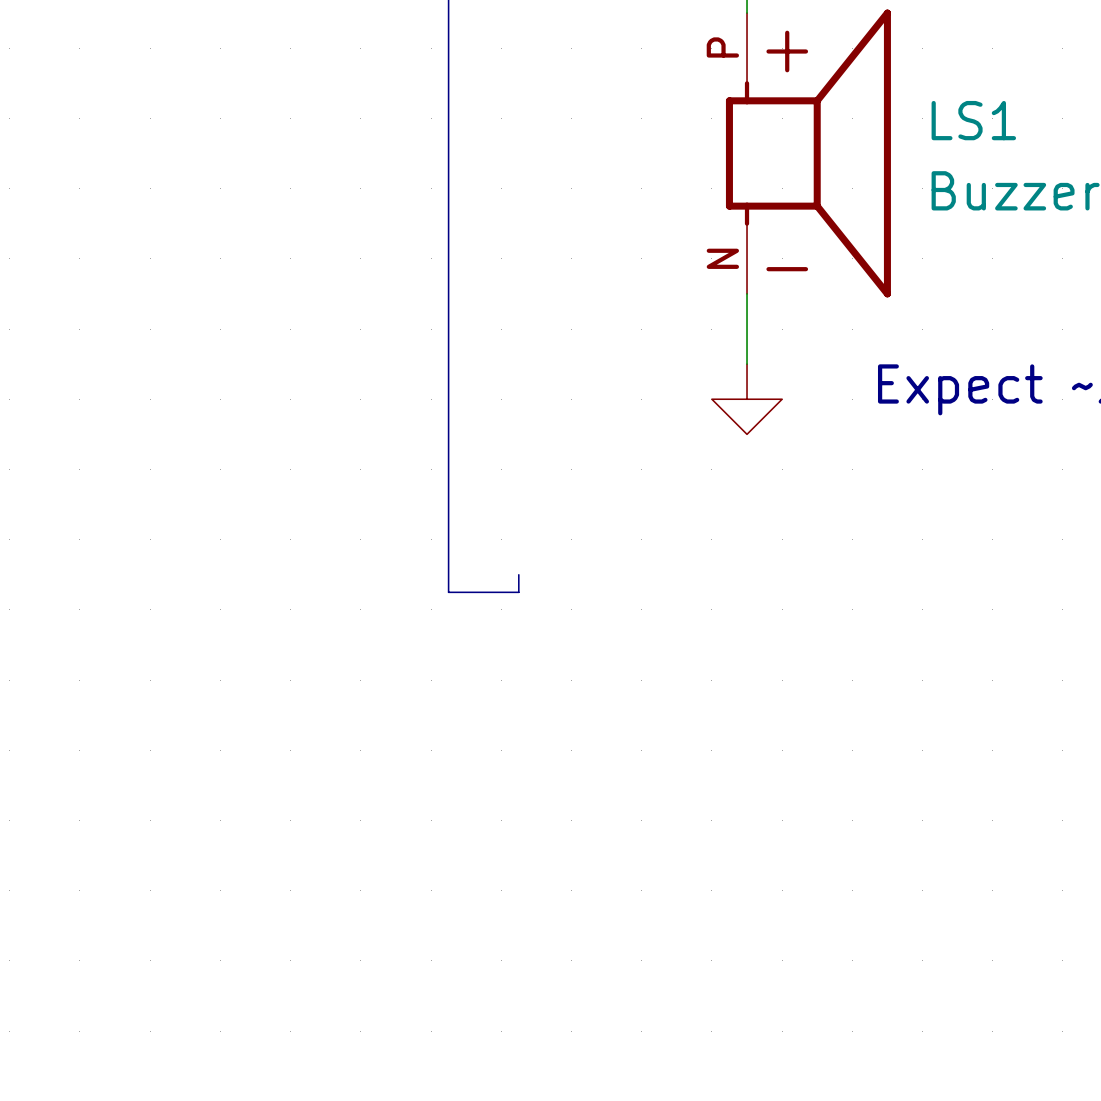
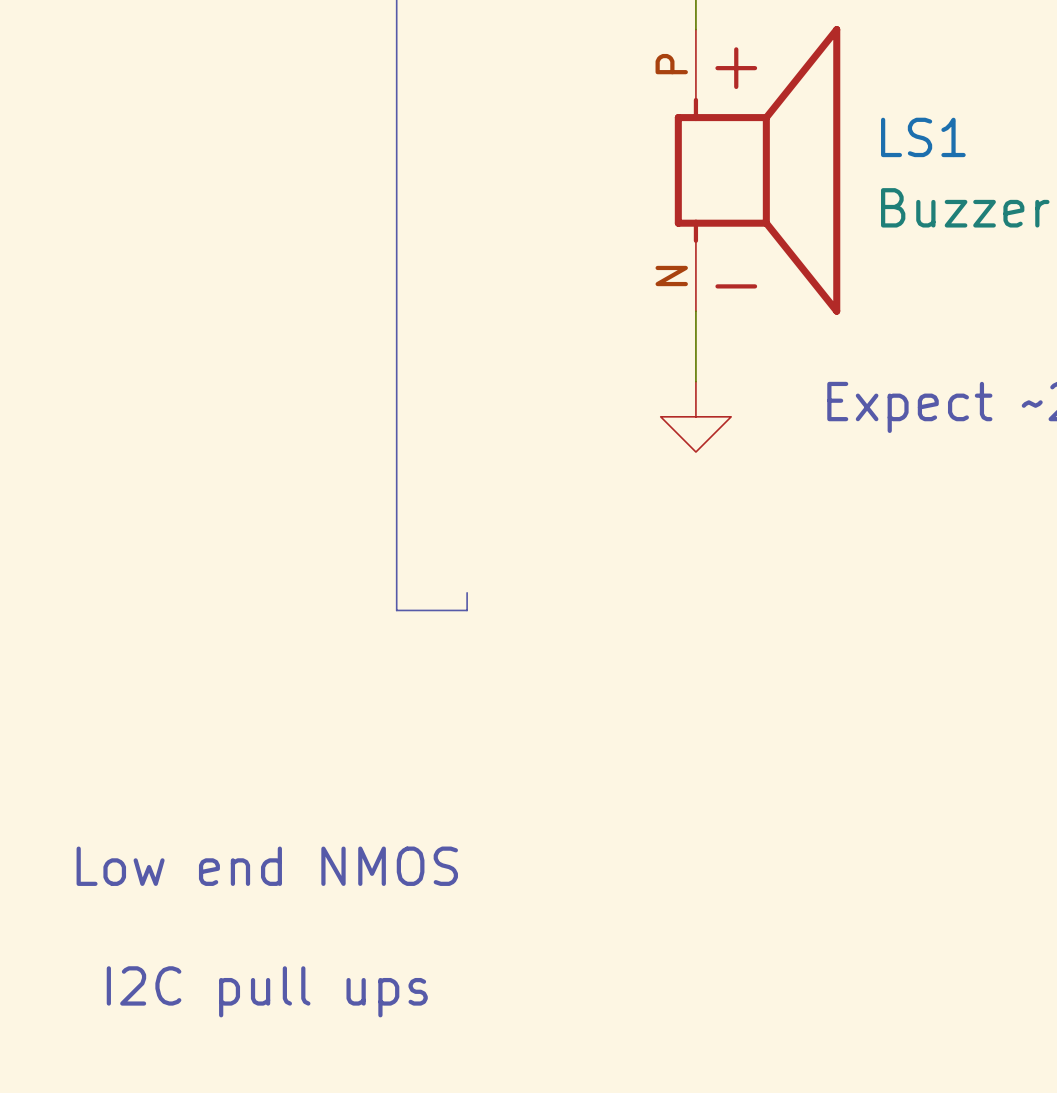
text: none -> Low end NMOS (267, 866)
text: none -> I2C pull ups (267, 991)

